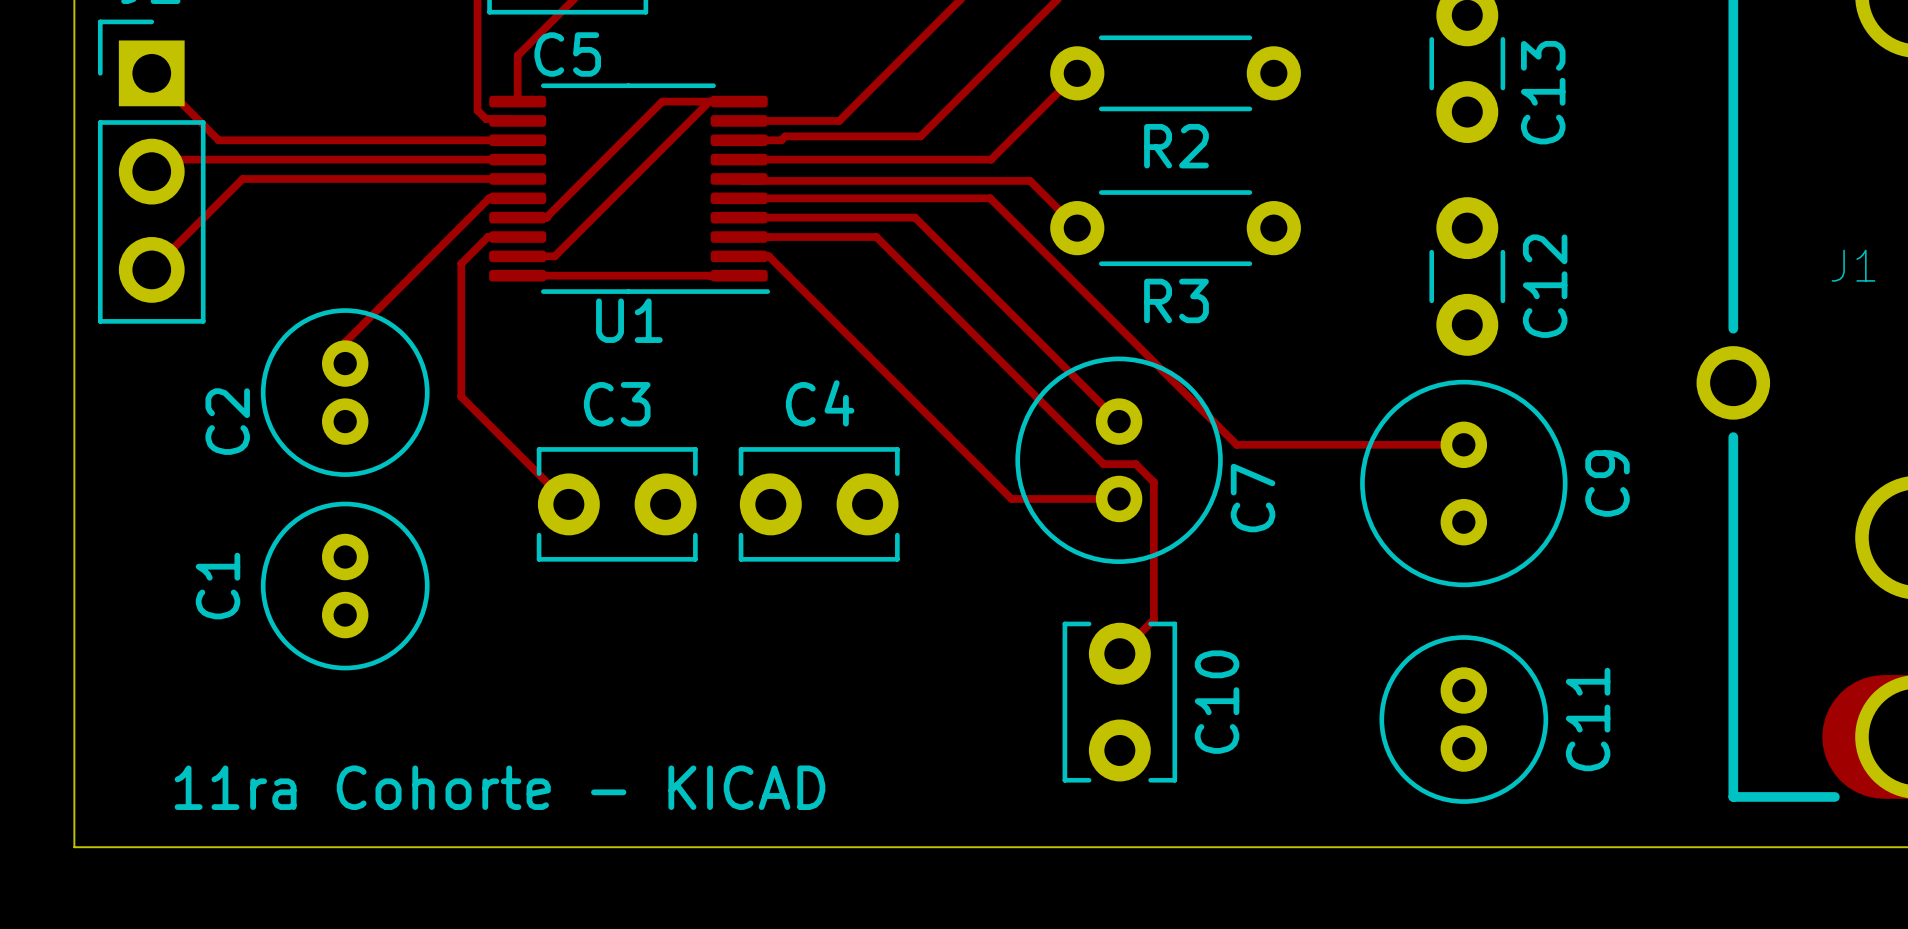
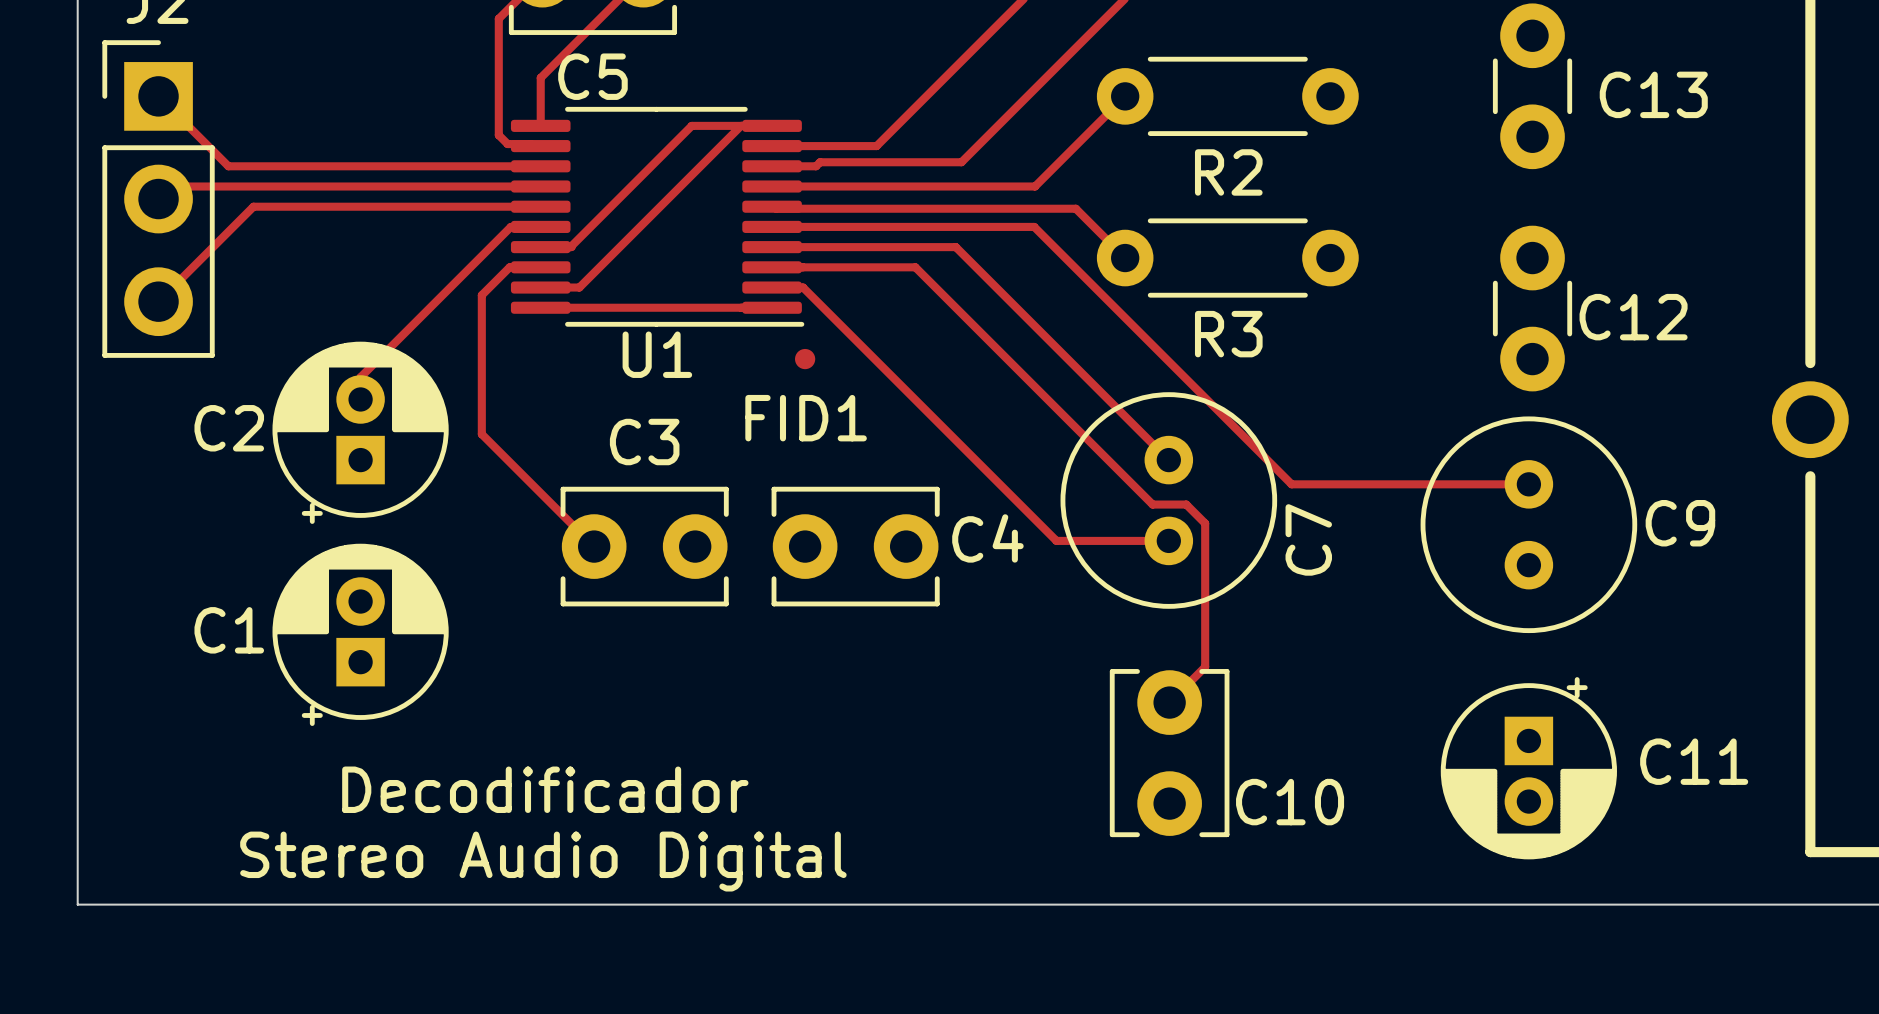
C13 name rotation: 0° (1543, 92) -> 90° clockwise (1653, 94)
C12 name rotation: 0° (1545, 286) -> 90° clockwise (1633, 317)
C2 footprint: [260, 308, 430, 477] -> [272, 341, 449, 524]
FID1: none -> (805, 359)
C4 name position: C4 (820, 403) -> C4 (987, 538)
C9 name rotation: 0° (1607, 483) -> 90° clockwise (1680, 523)
C1 footprint: [260, 501, 430, 671] -> [272, 543, 449, 726]
C11 footprint: [1379, 635, 1549, 804] -> [1440, 677, 1617, 860]
C10 name rotation: 0° (1217, 702) -> 90° clockwise (1290, 802)
text: none -> Decodificador (545, 789)
text: 11ra Cohorte - KICAD (499, 787) -> Stereo Audio Digital (543, 861)

